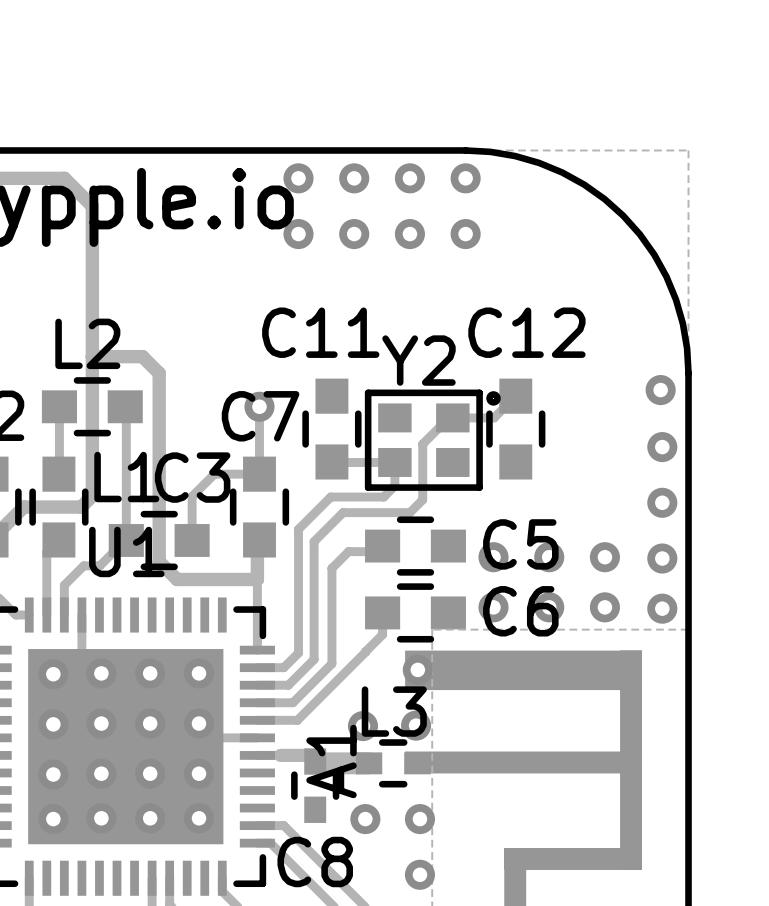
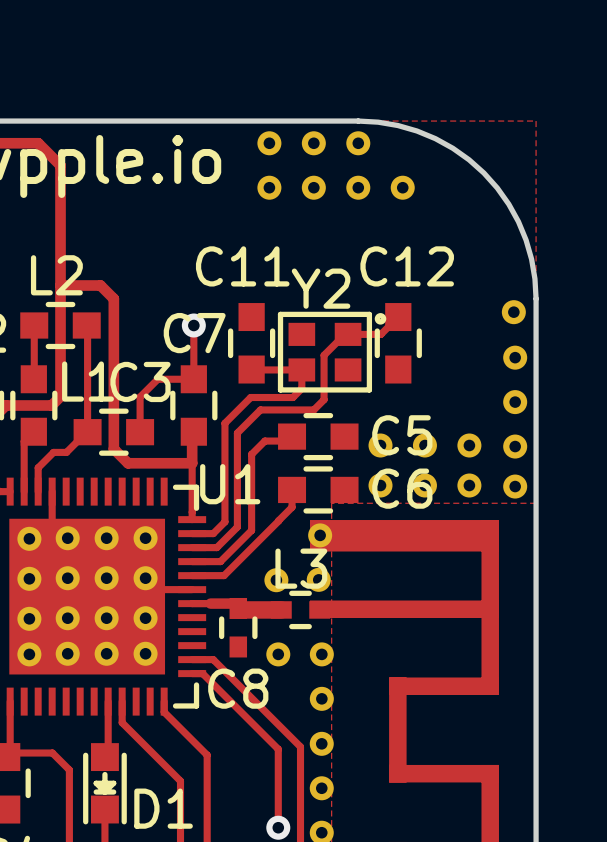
part: (298, 178) -> none
part: (298, 234) -> none
part: none -> (402, 187)
U1 name position: U1 (126, 551) -> U1 (230, 484)
A1 name: A1 (331, 761) -> none

